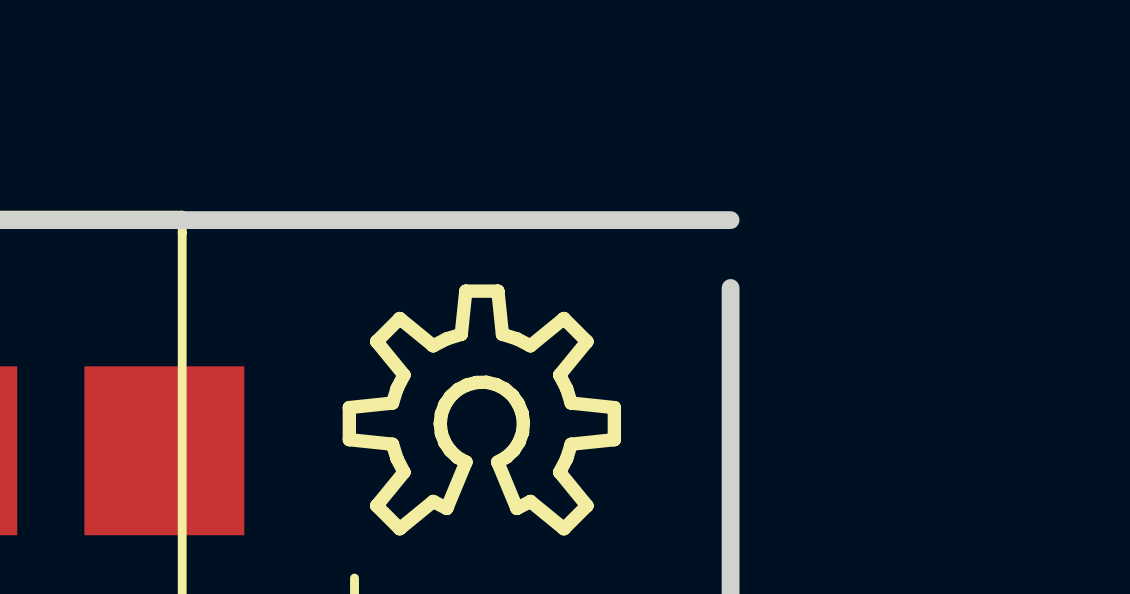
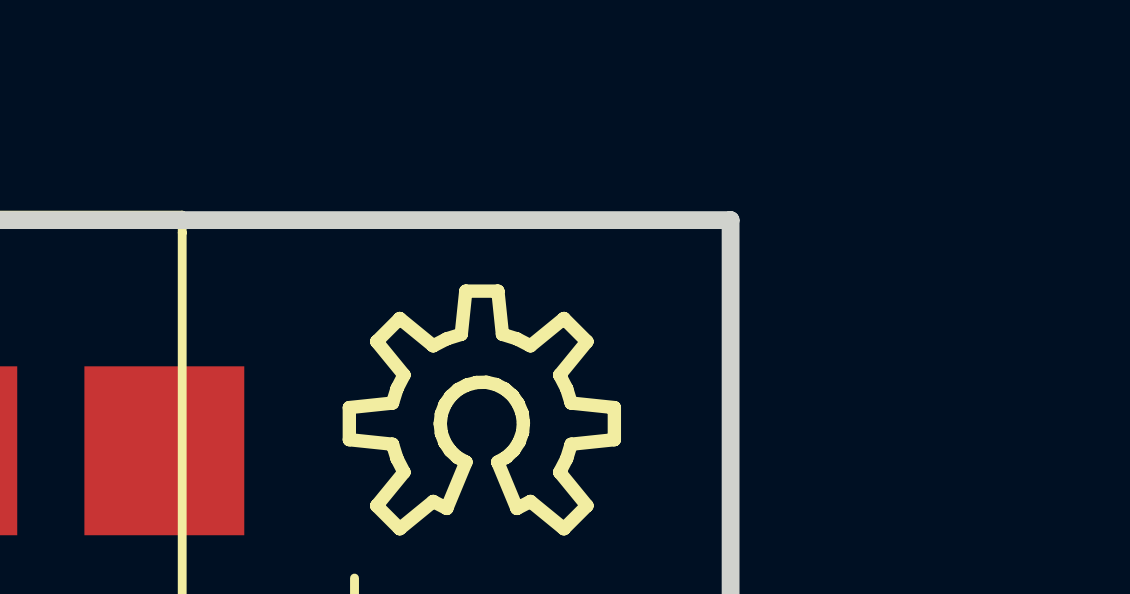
board edge: none -> (730, 220) (730, 287)

